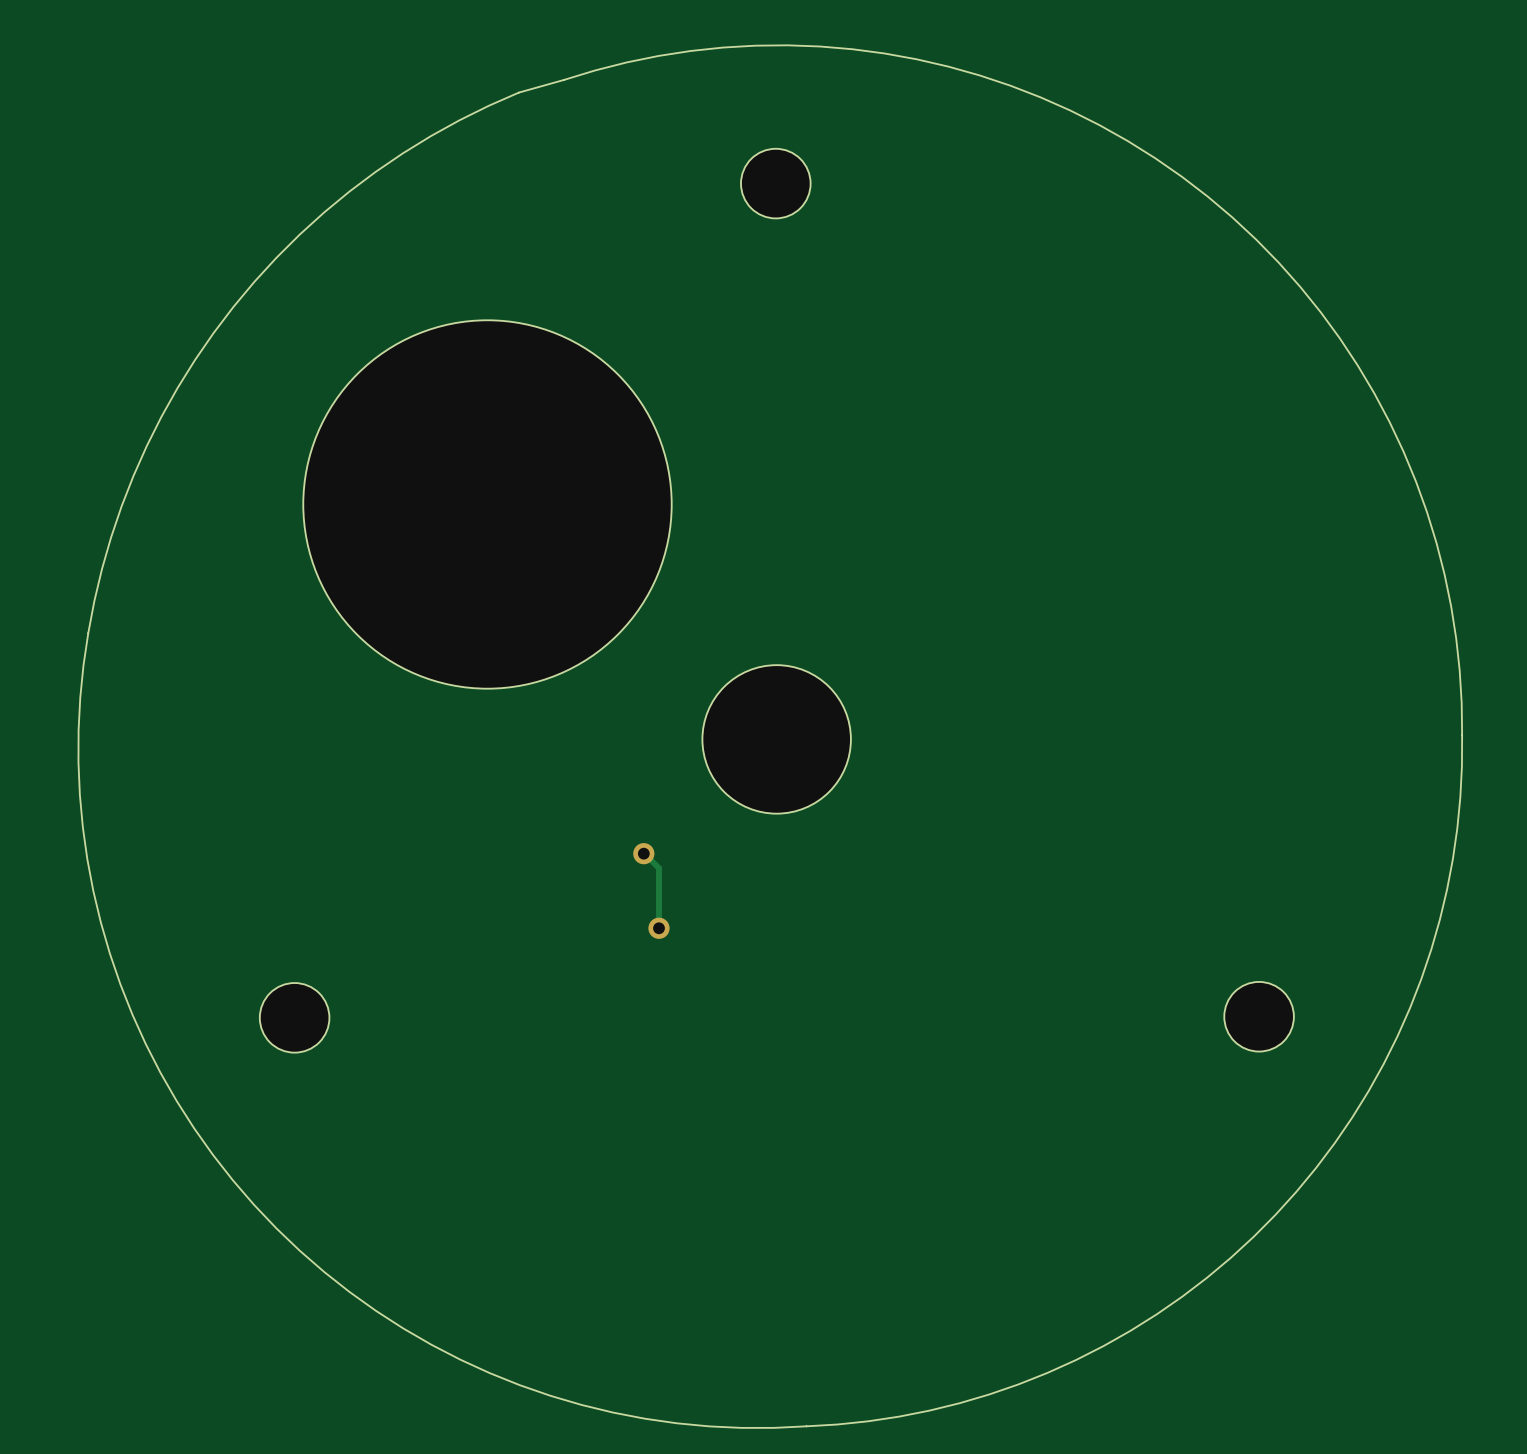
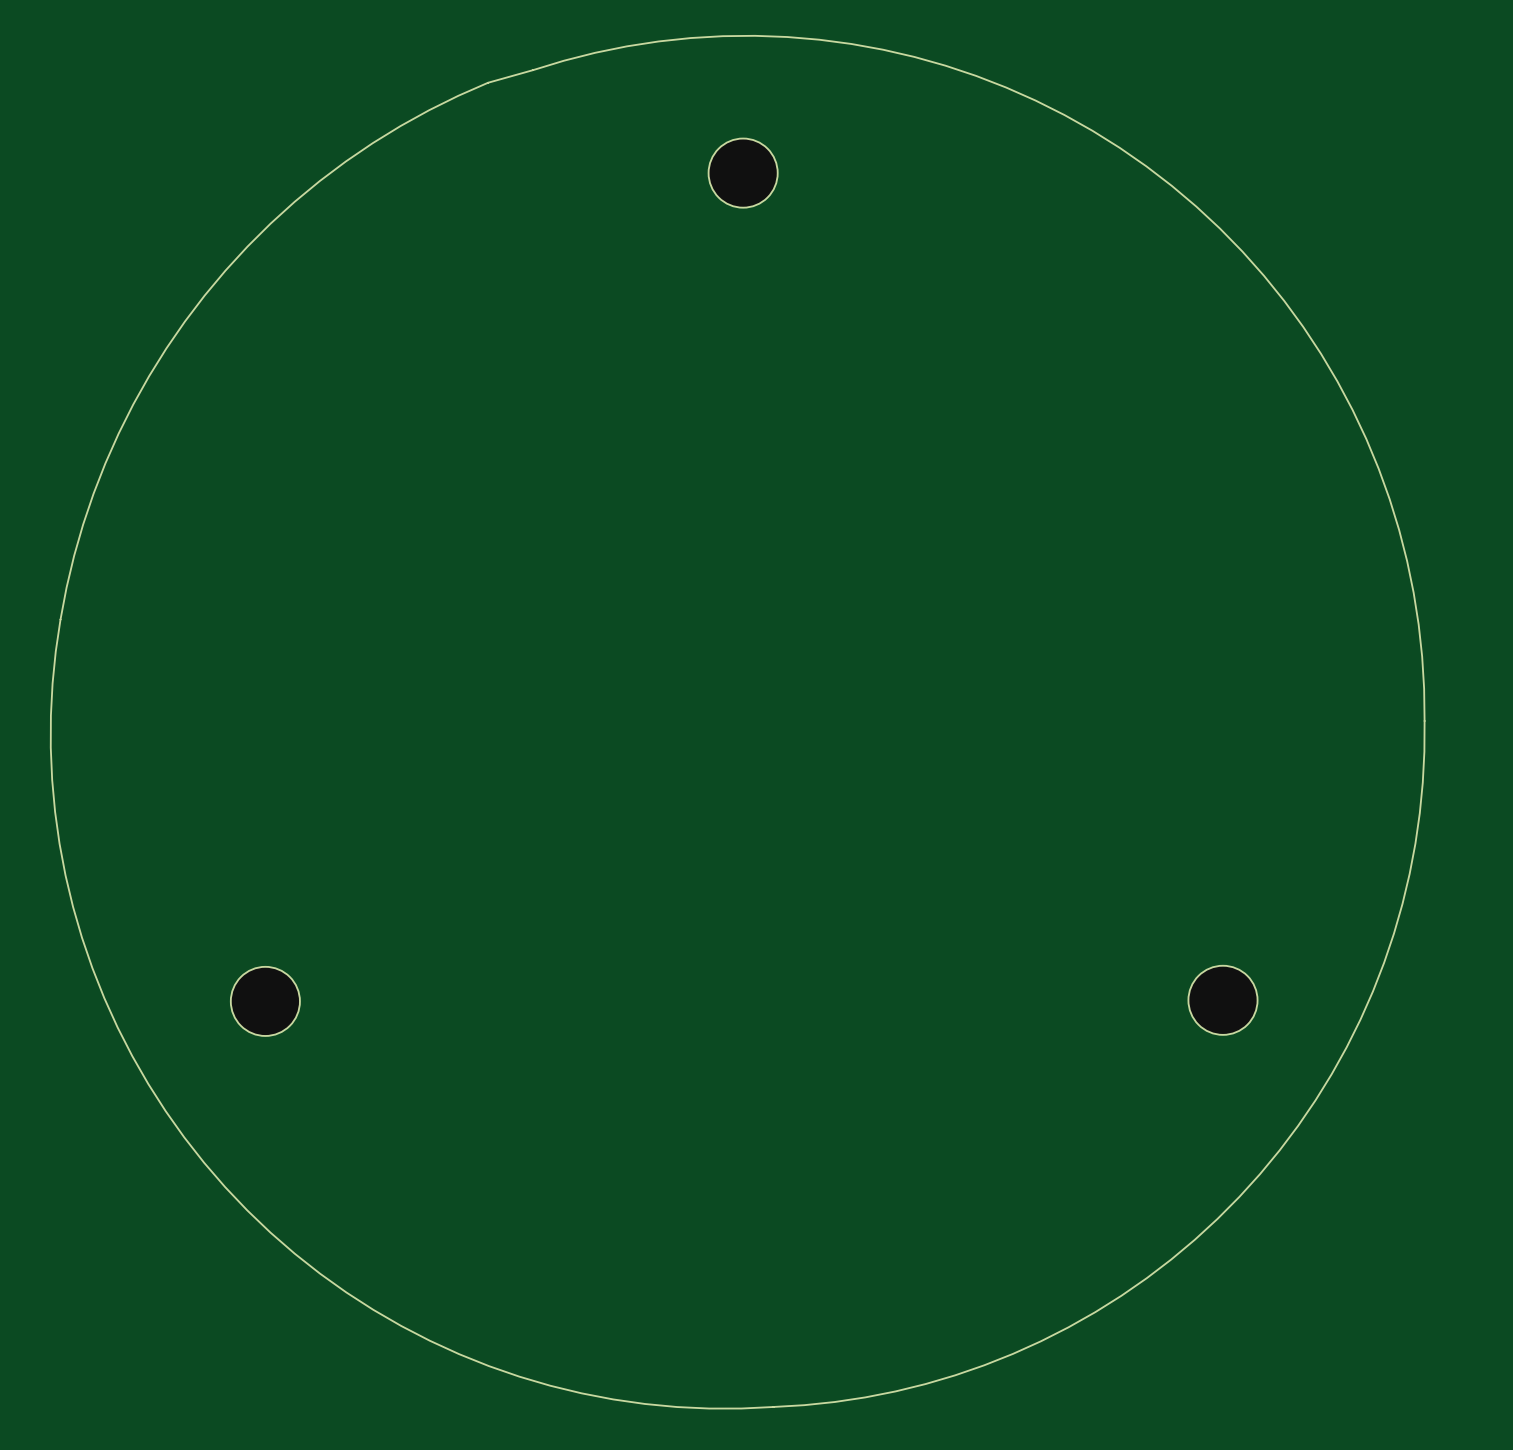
hole: (487, 504) -> none
hole: (776, 739) -> none
track: (643, 853) (658, 868) (658, 928) -> none
via: (643, 853) -> none
via: (658, 928) -> none

